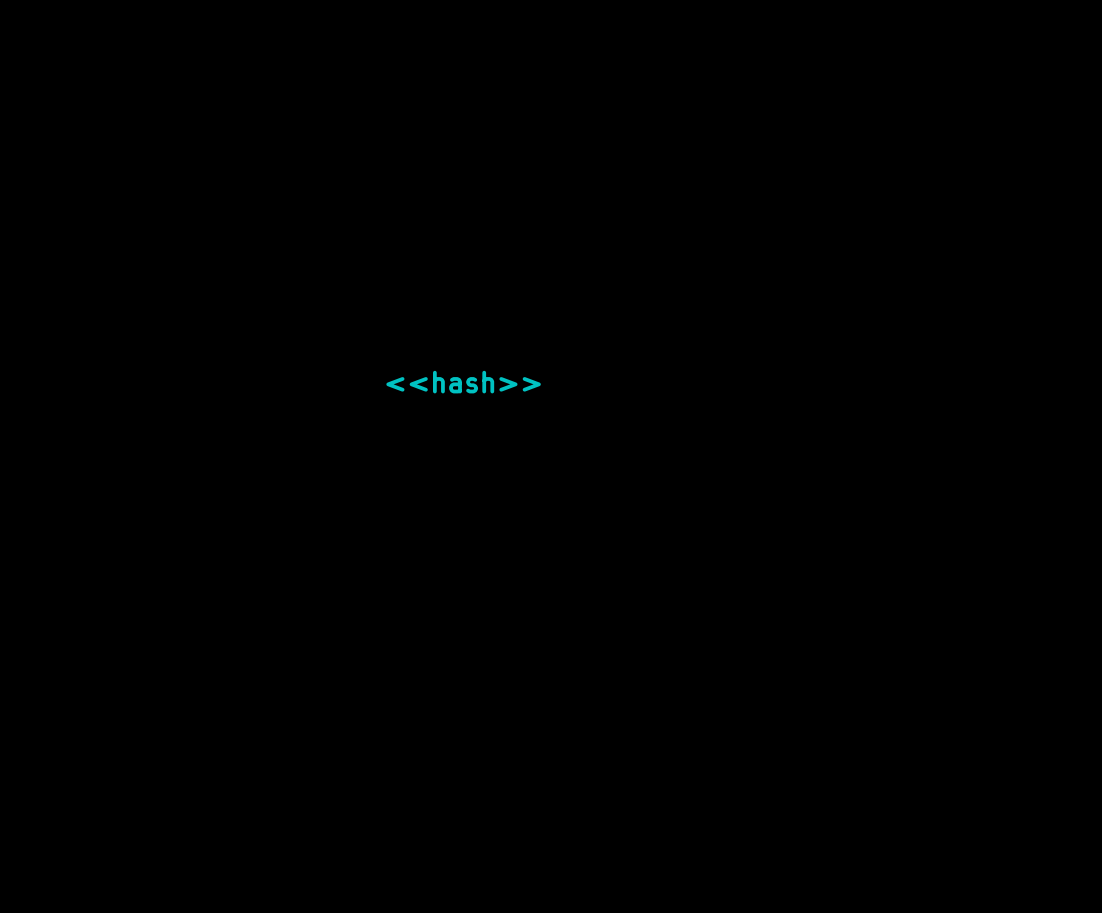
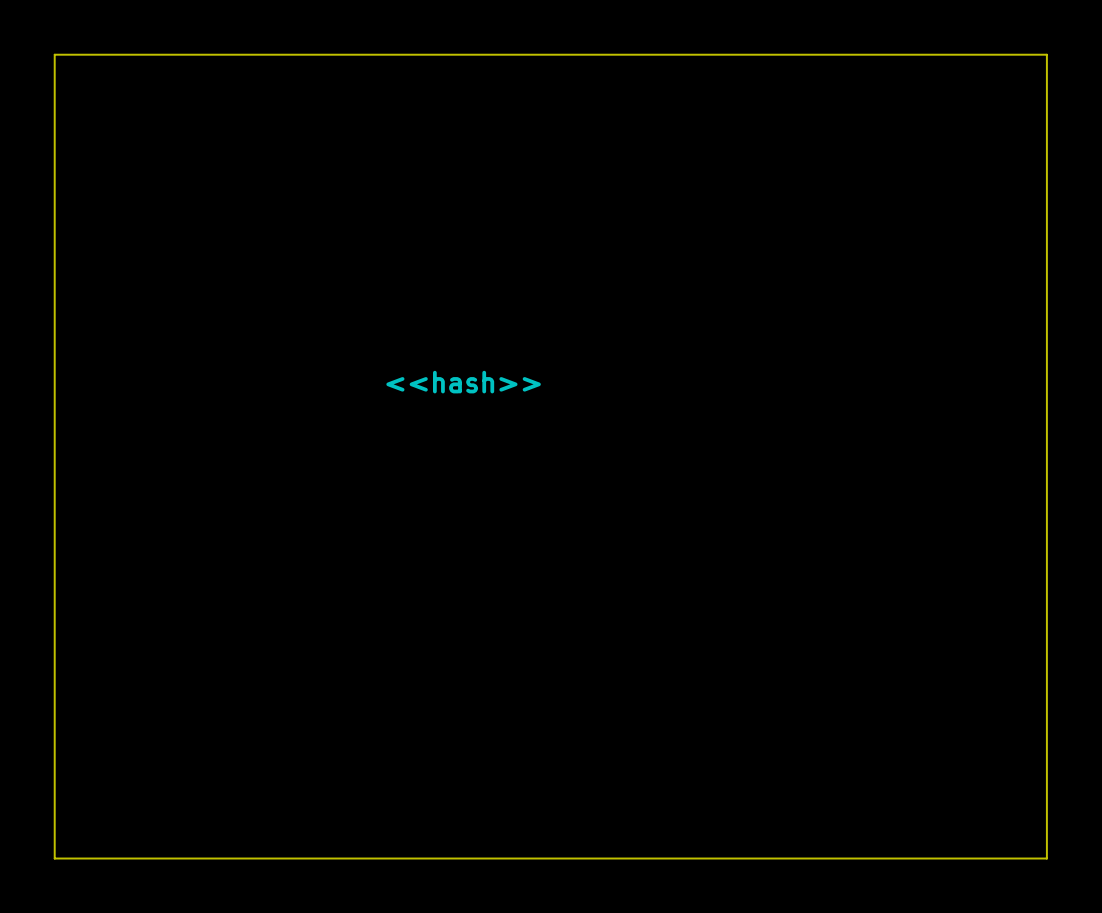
board edge: none -> (54, 54) (1046, 54) (1046, 858) (54, 858) (54, 54)

